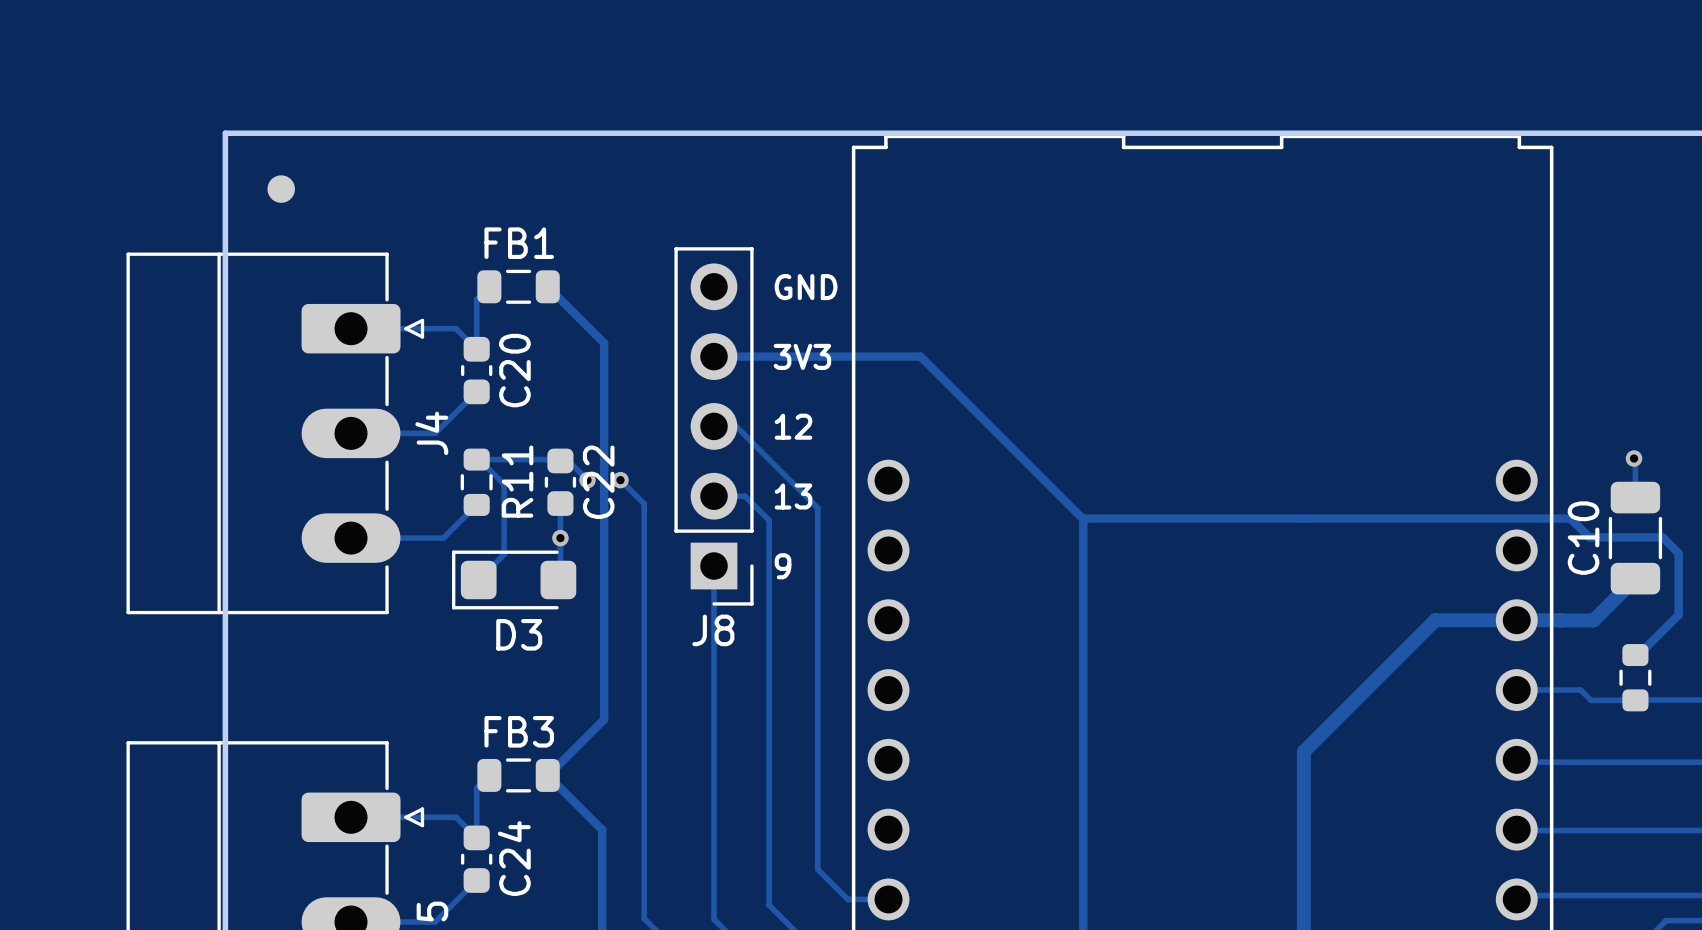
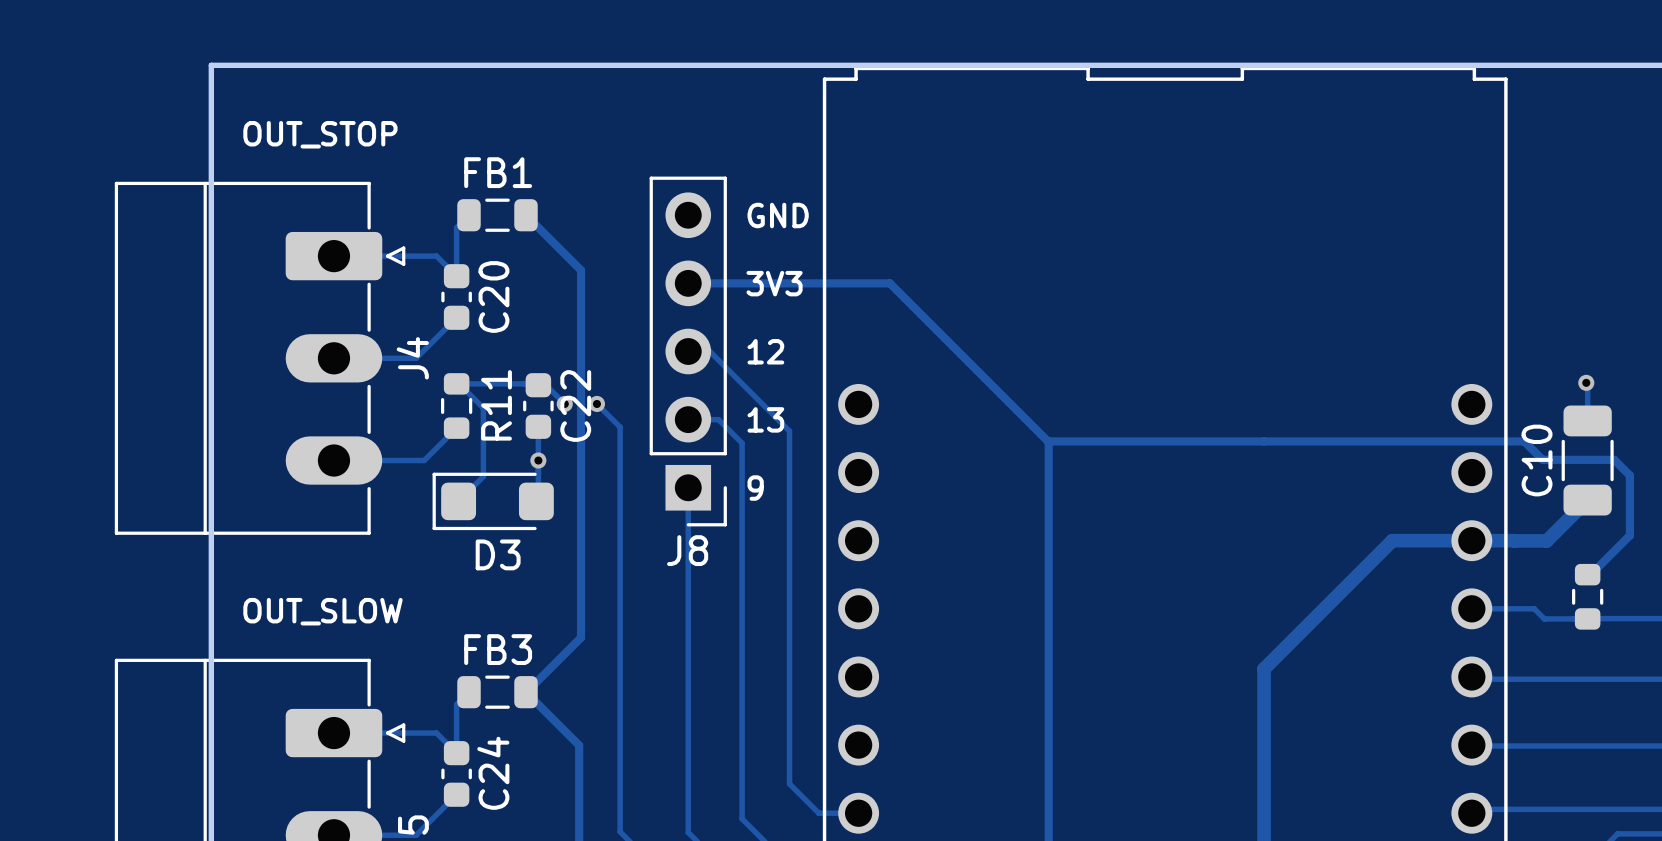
part: (281, 189) -> none
text: none -> OUT_STOP (320, 134)
text: none -> OUT_SLOW (322, 611)

